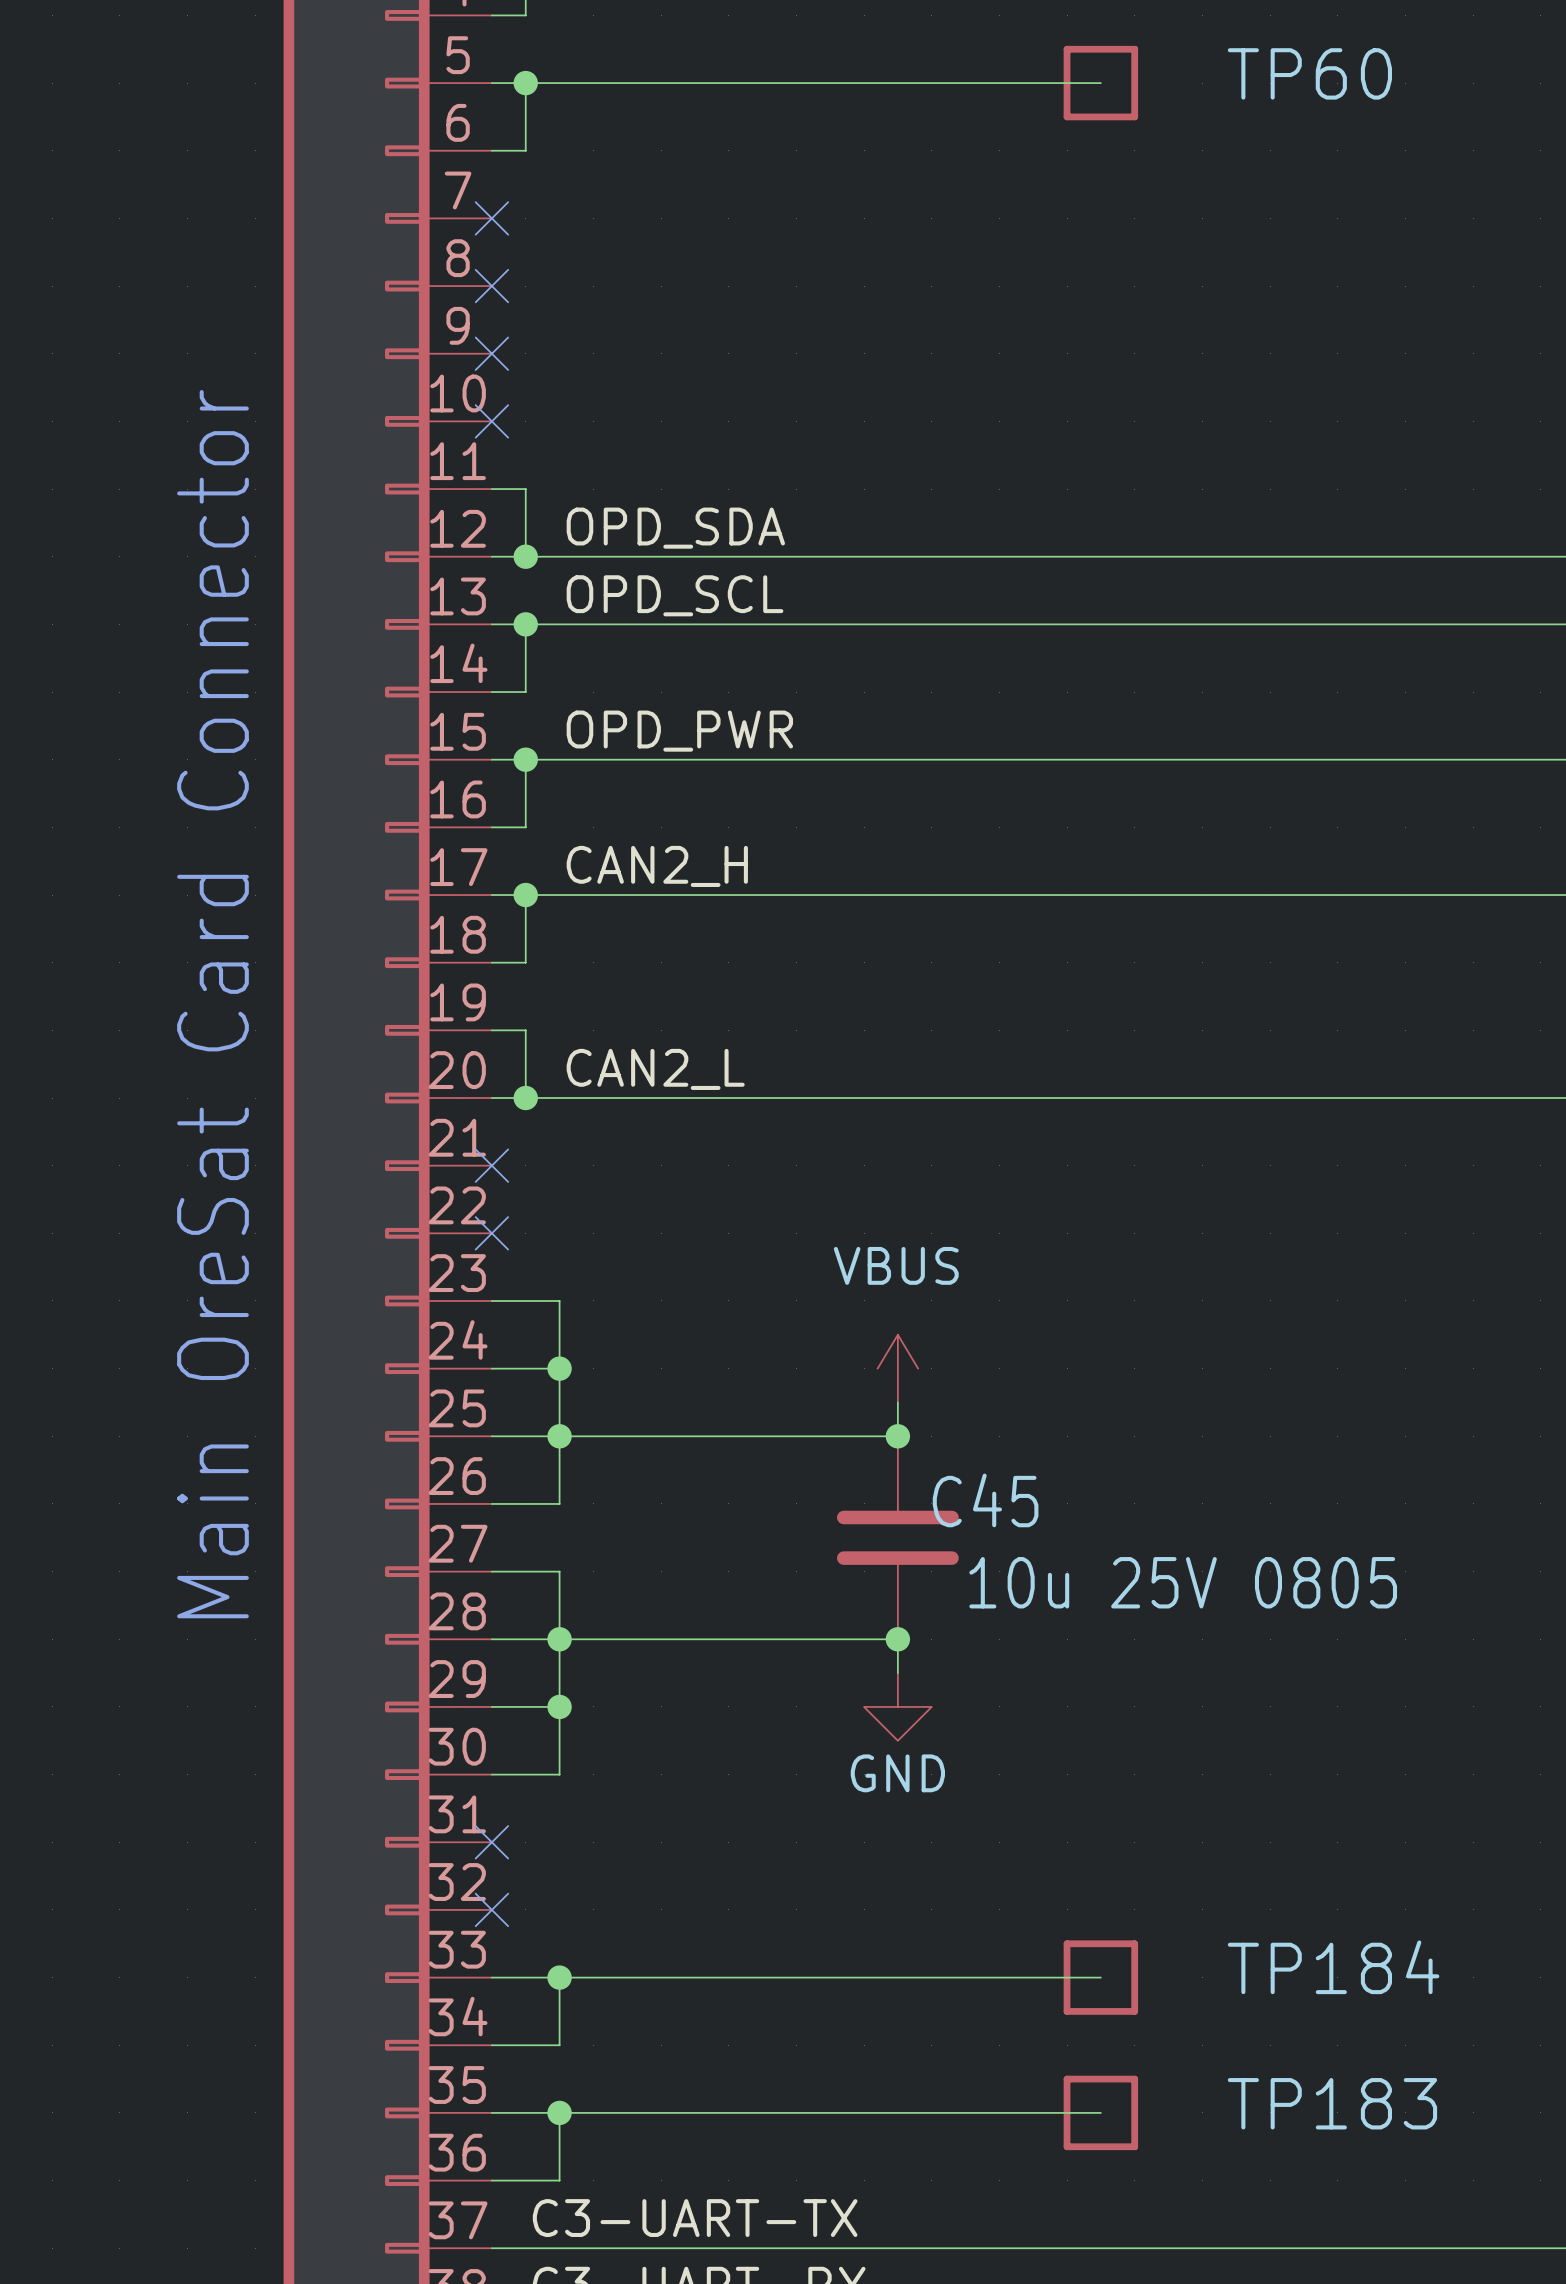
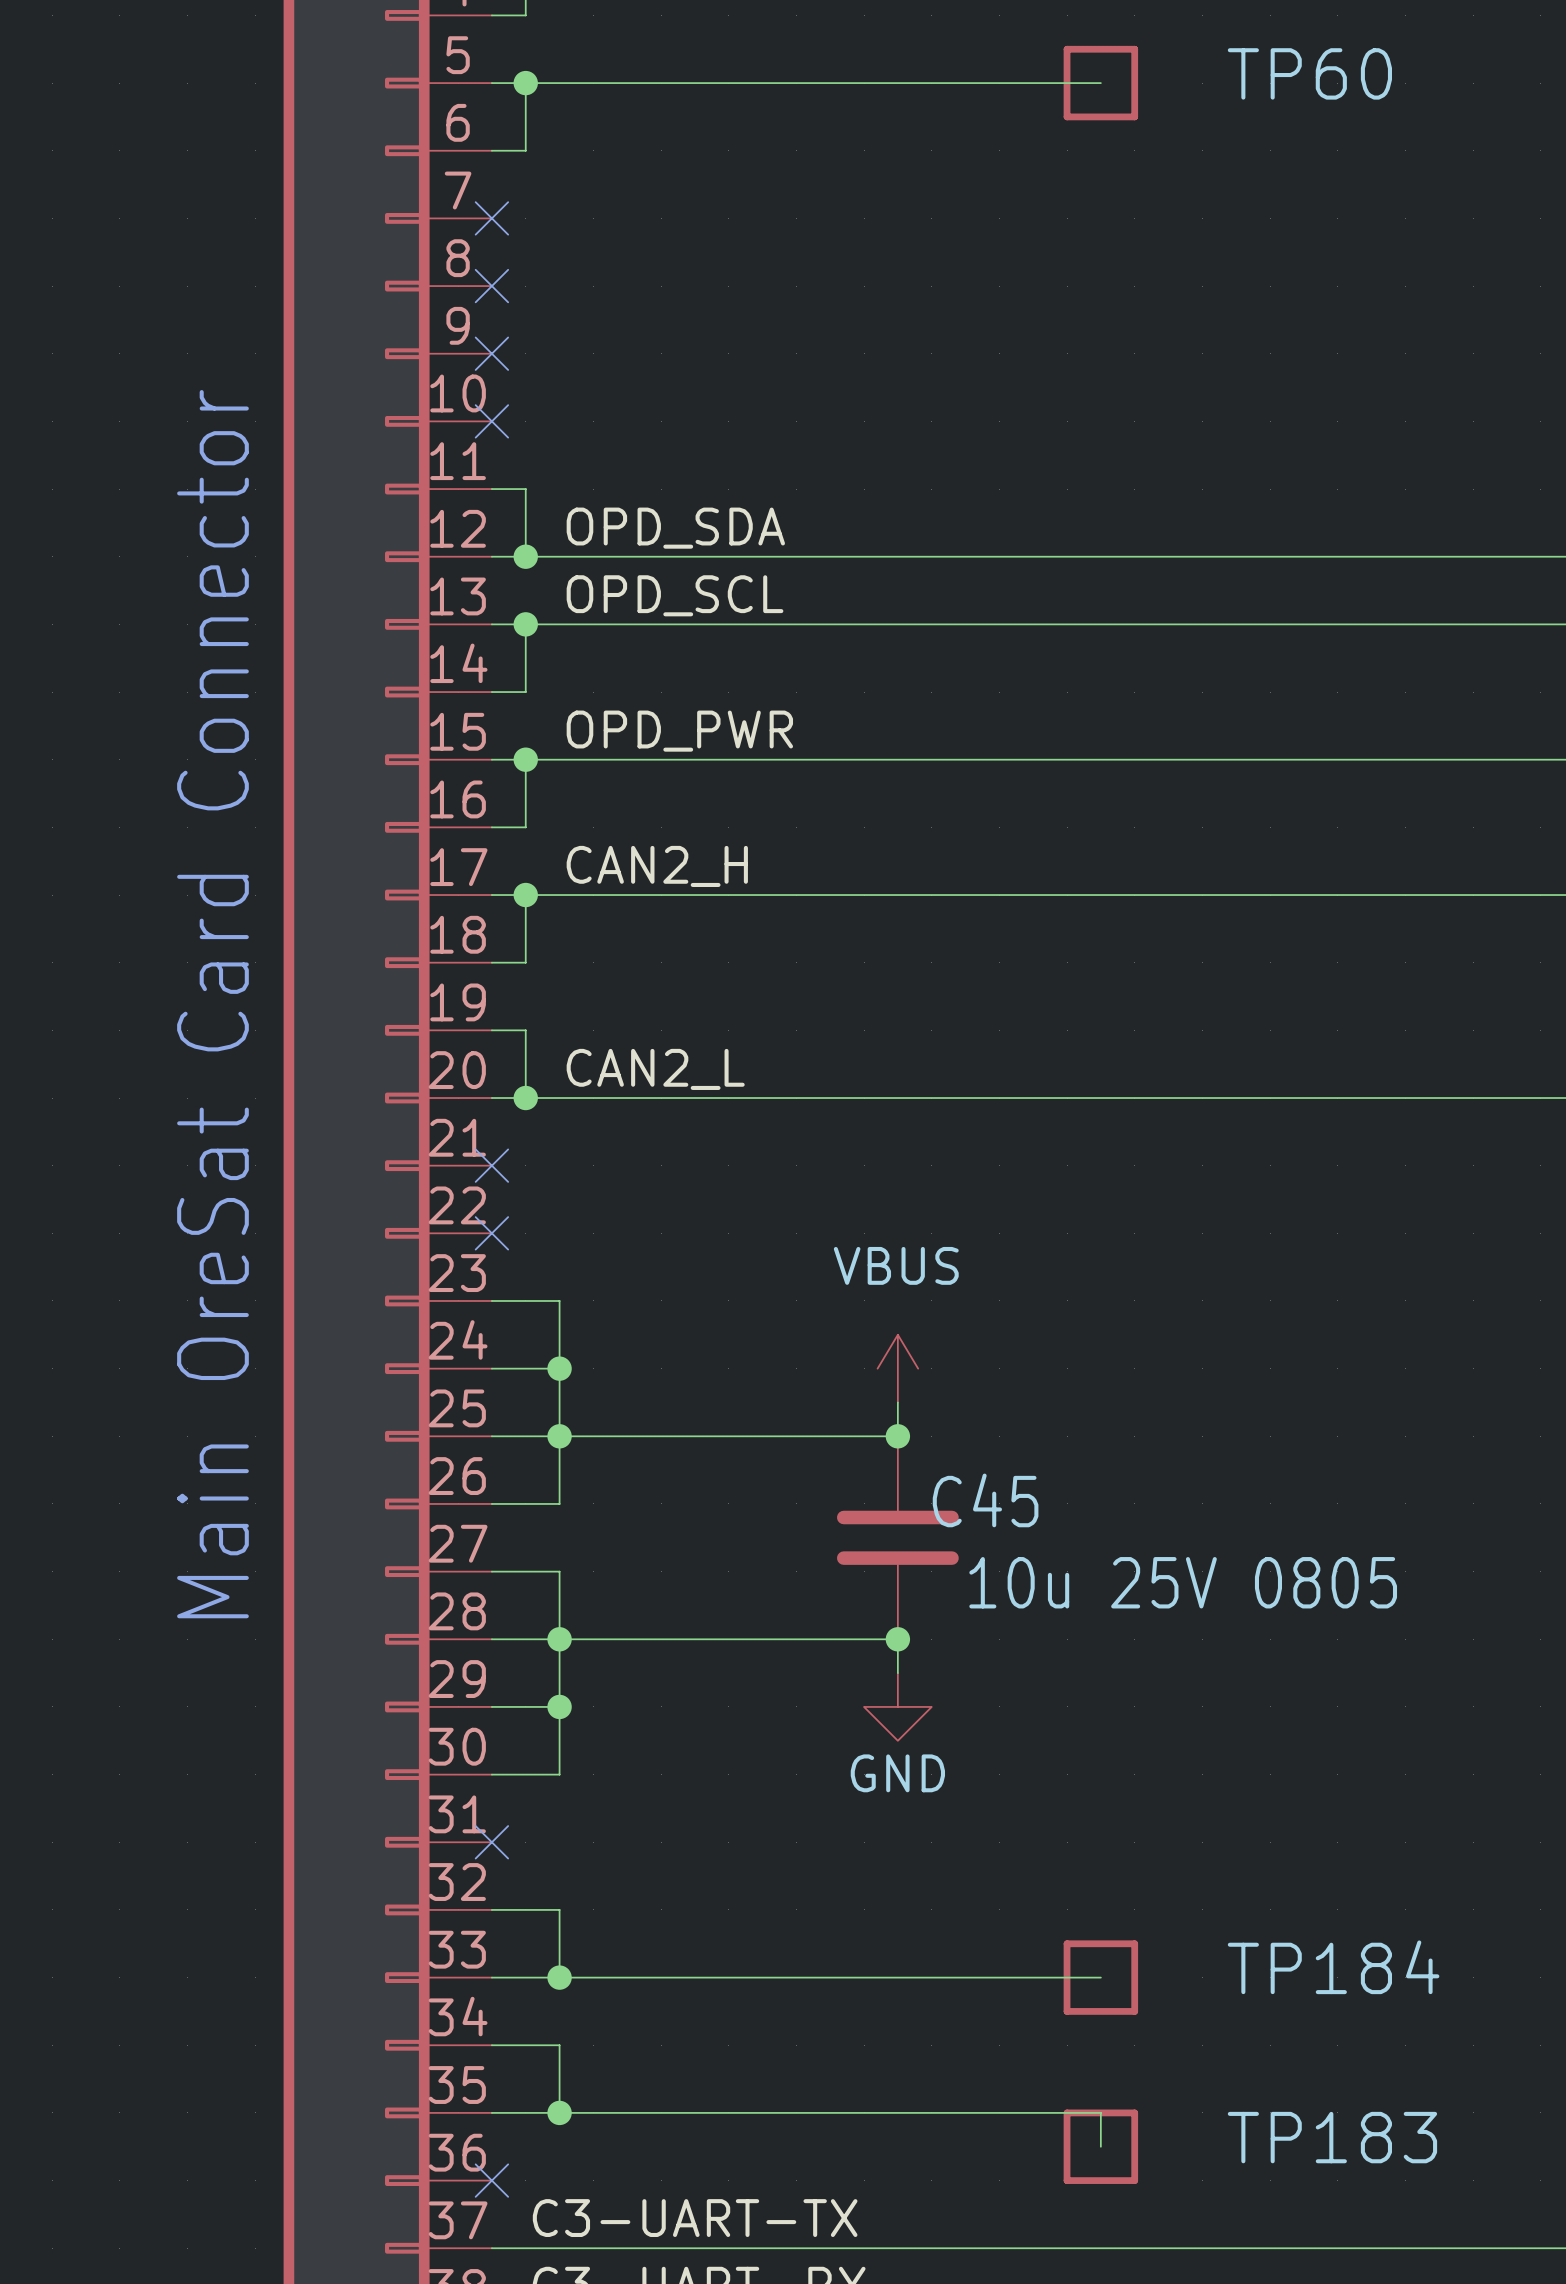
wire: none -> (491, 1909) (559, 1909) (559, 1977)
no-connect mark: (491, 1909) -> none
wire: (559, 1977) (559, 2045) -> (559, 2112) (559, 2045)
wire: (559, 2112) (559, 2180) (491, 2180) -> none
wire: none -> (1100, 2112) (1100, 2146)
TP183 position: (1100, 2112) -> (1100, 2146)
no-connect mark: none -> (491, 2180)

